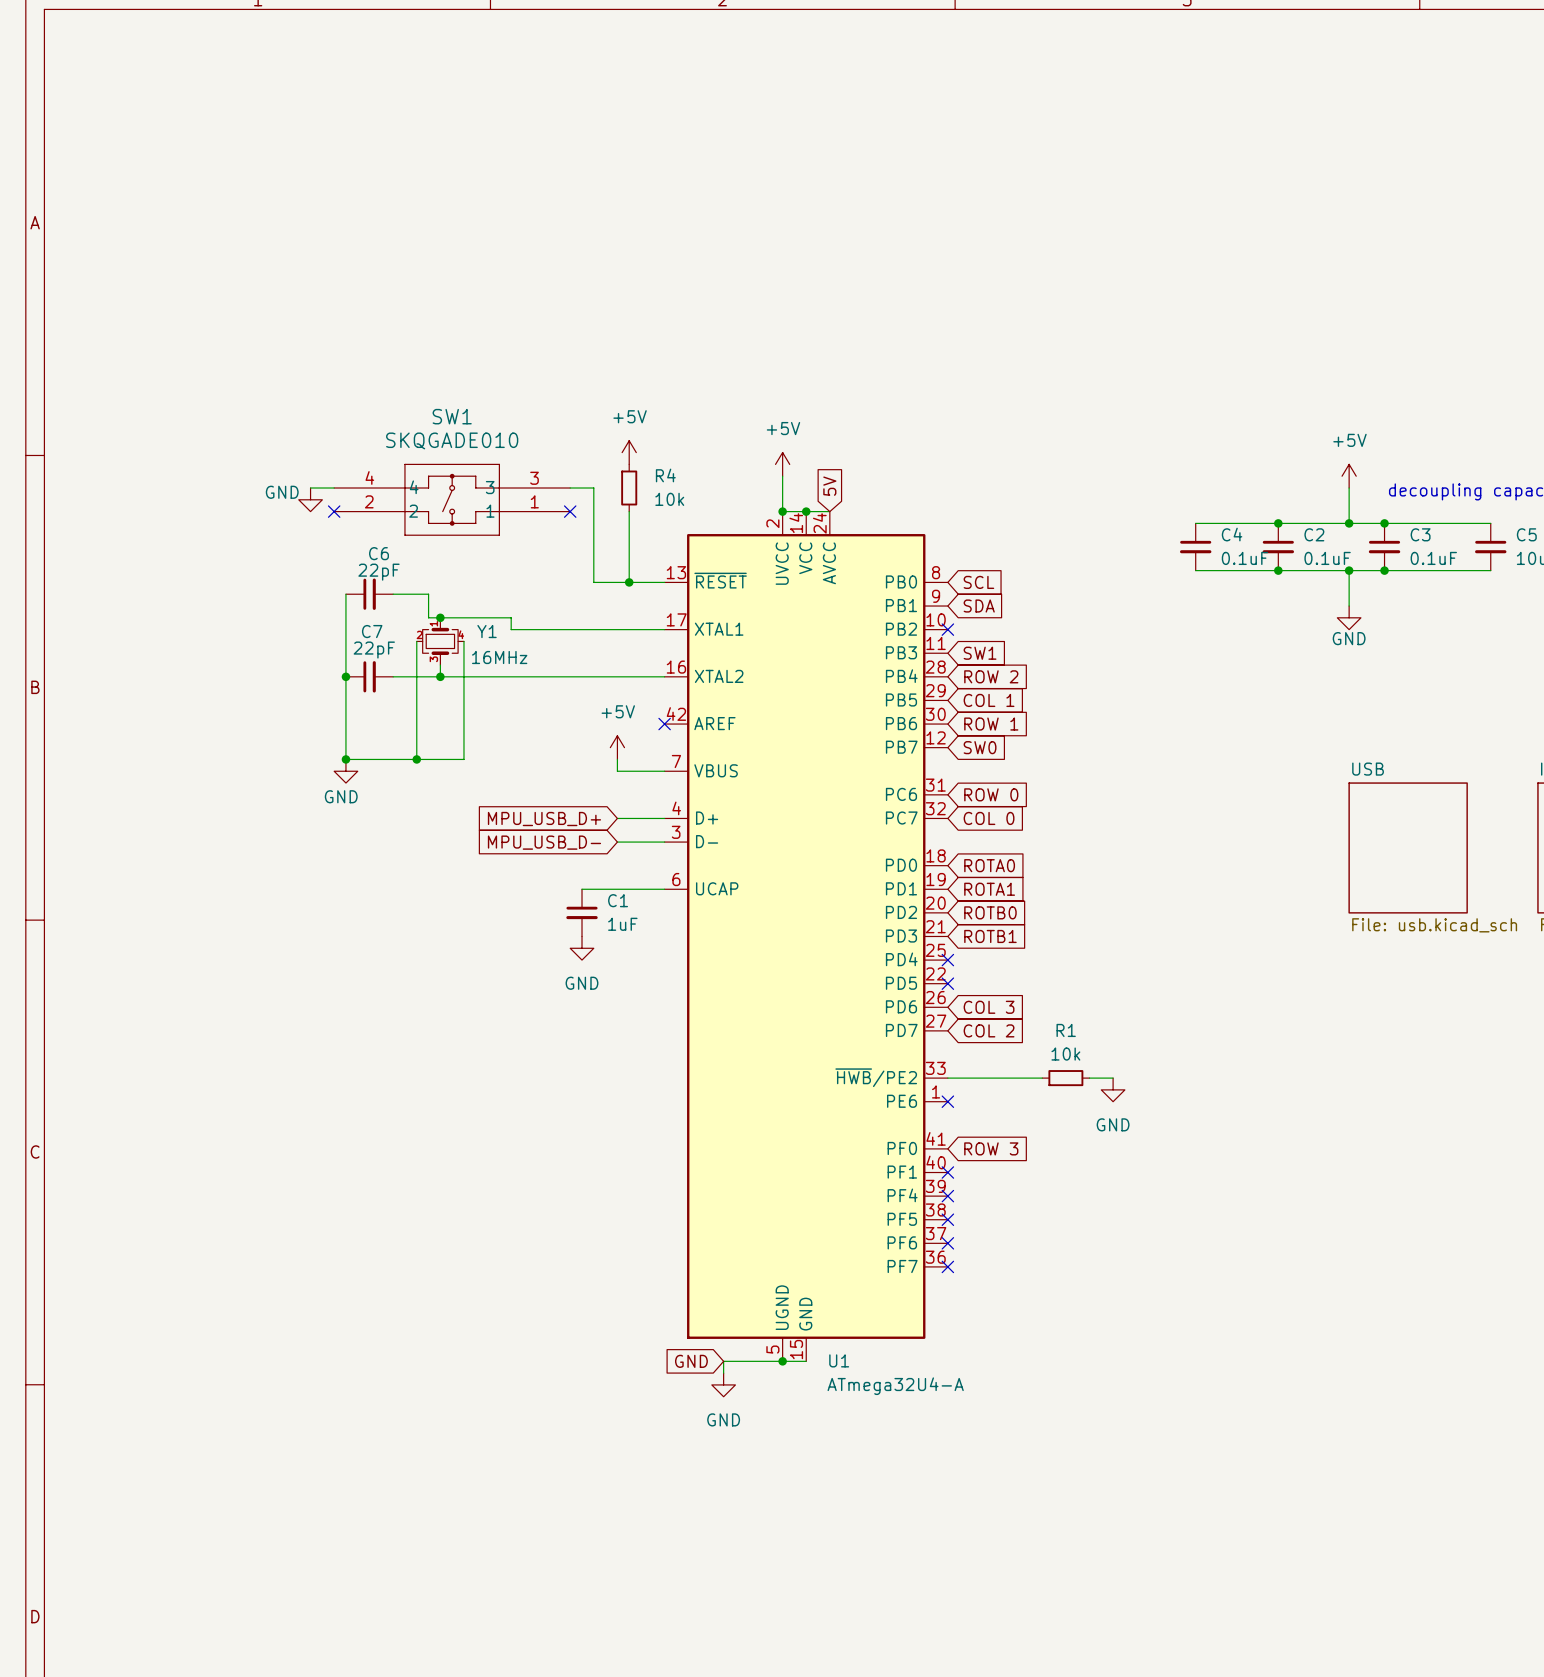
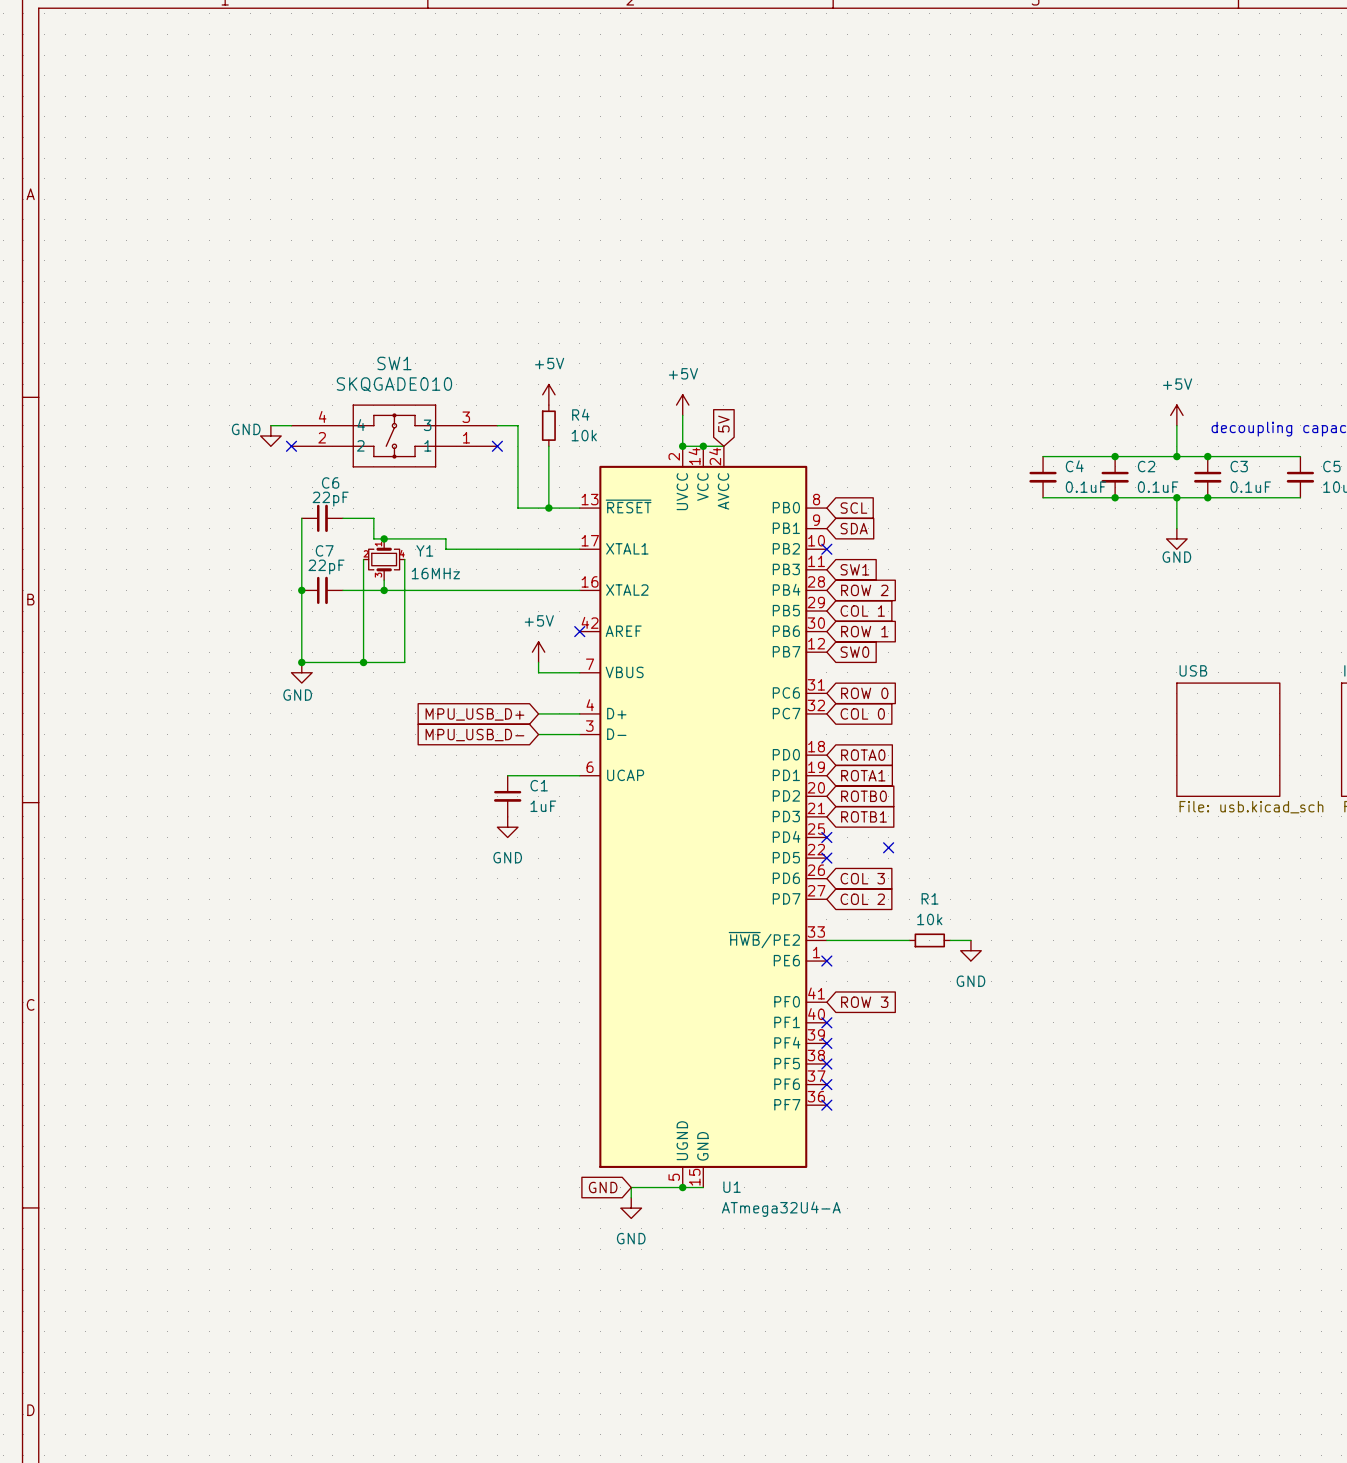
no-connect mark: none -> (888, 847)

